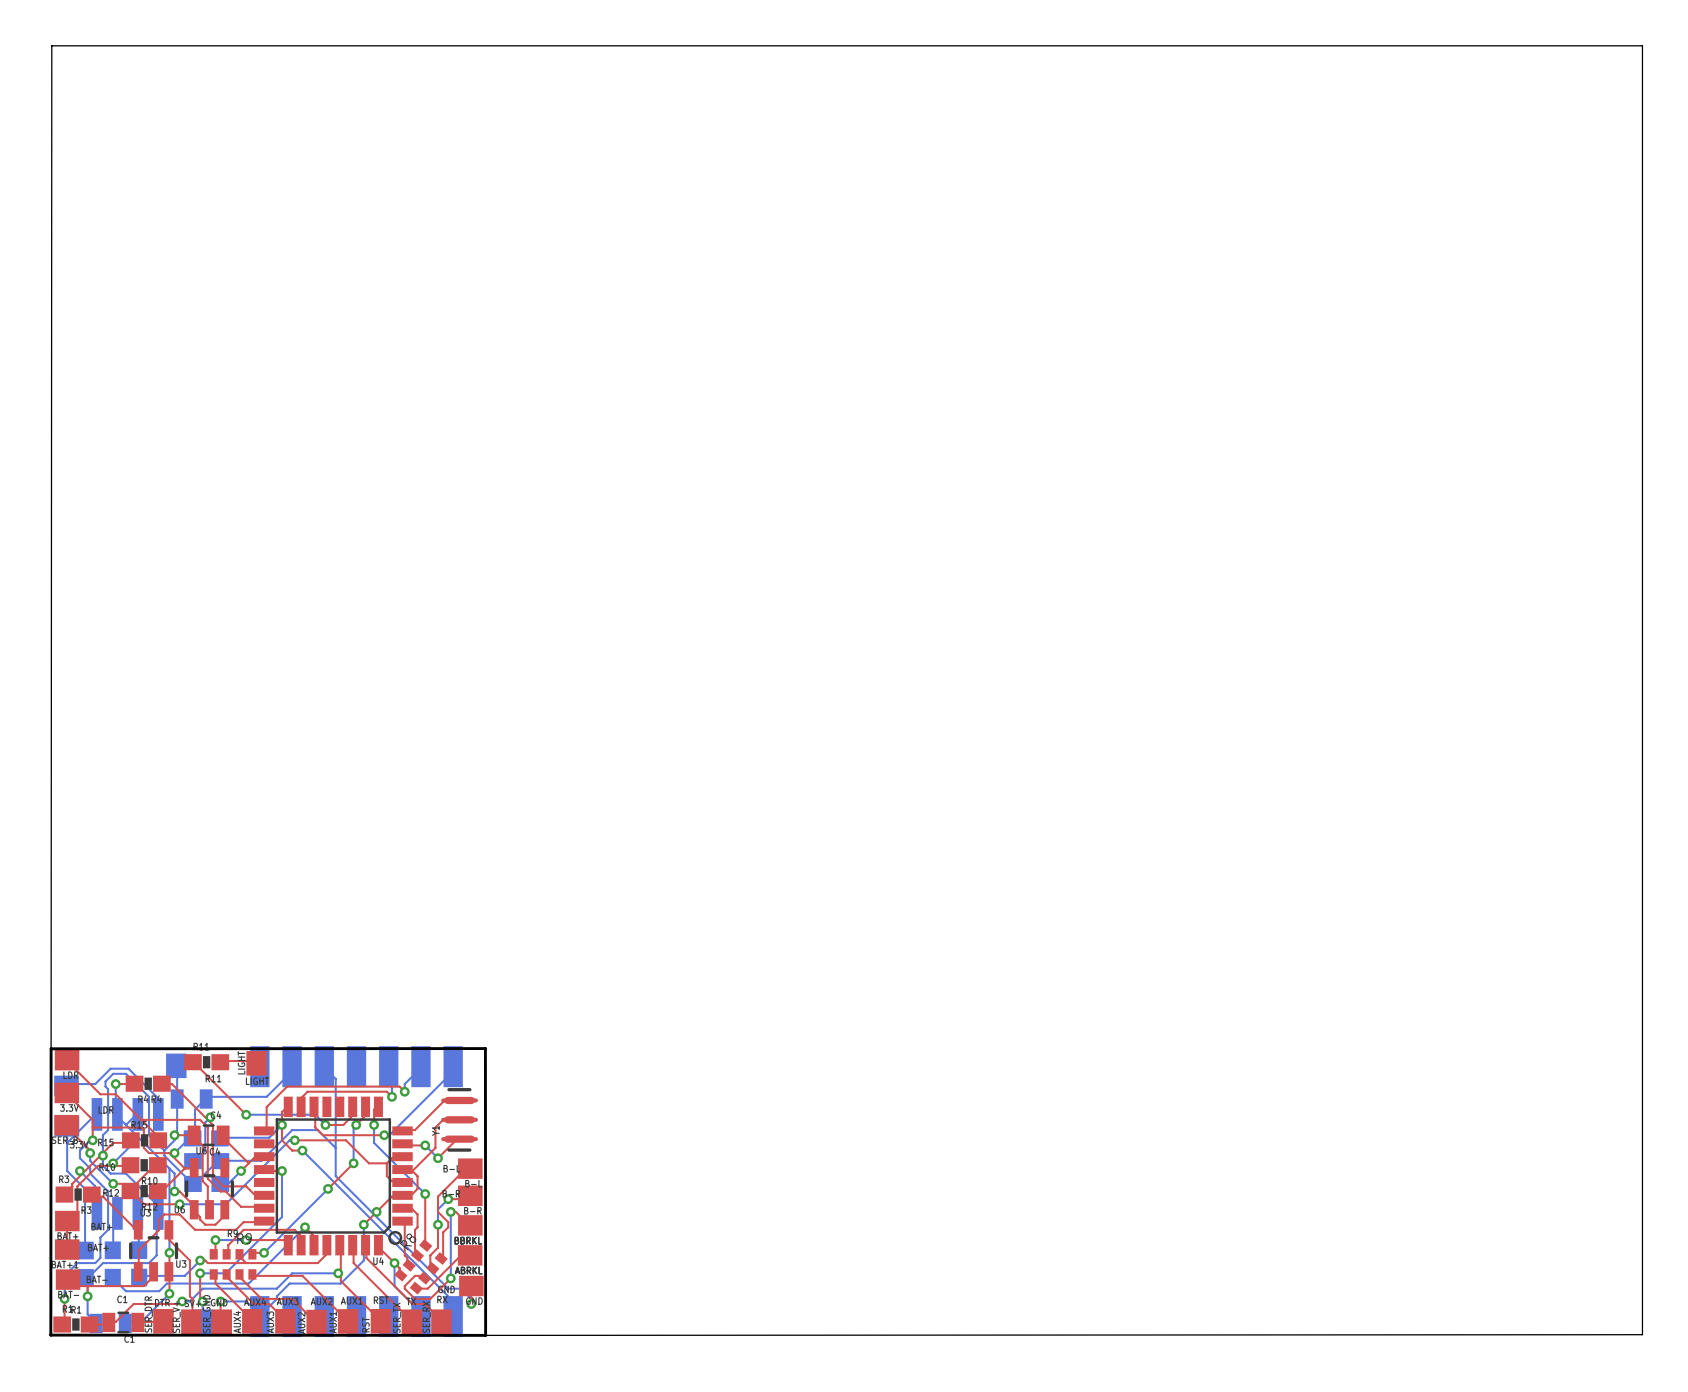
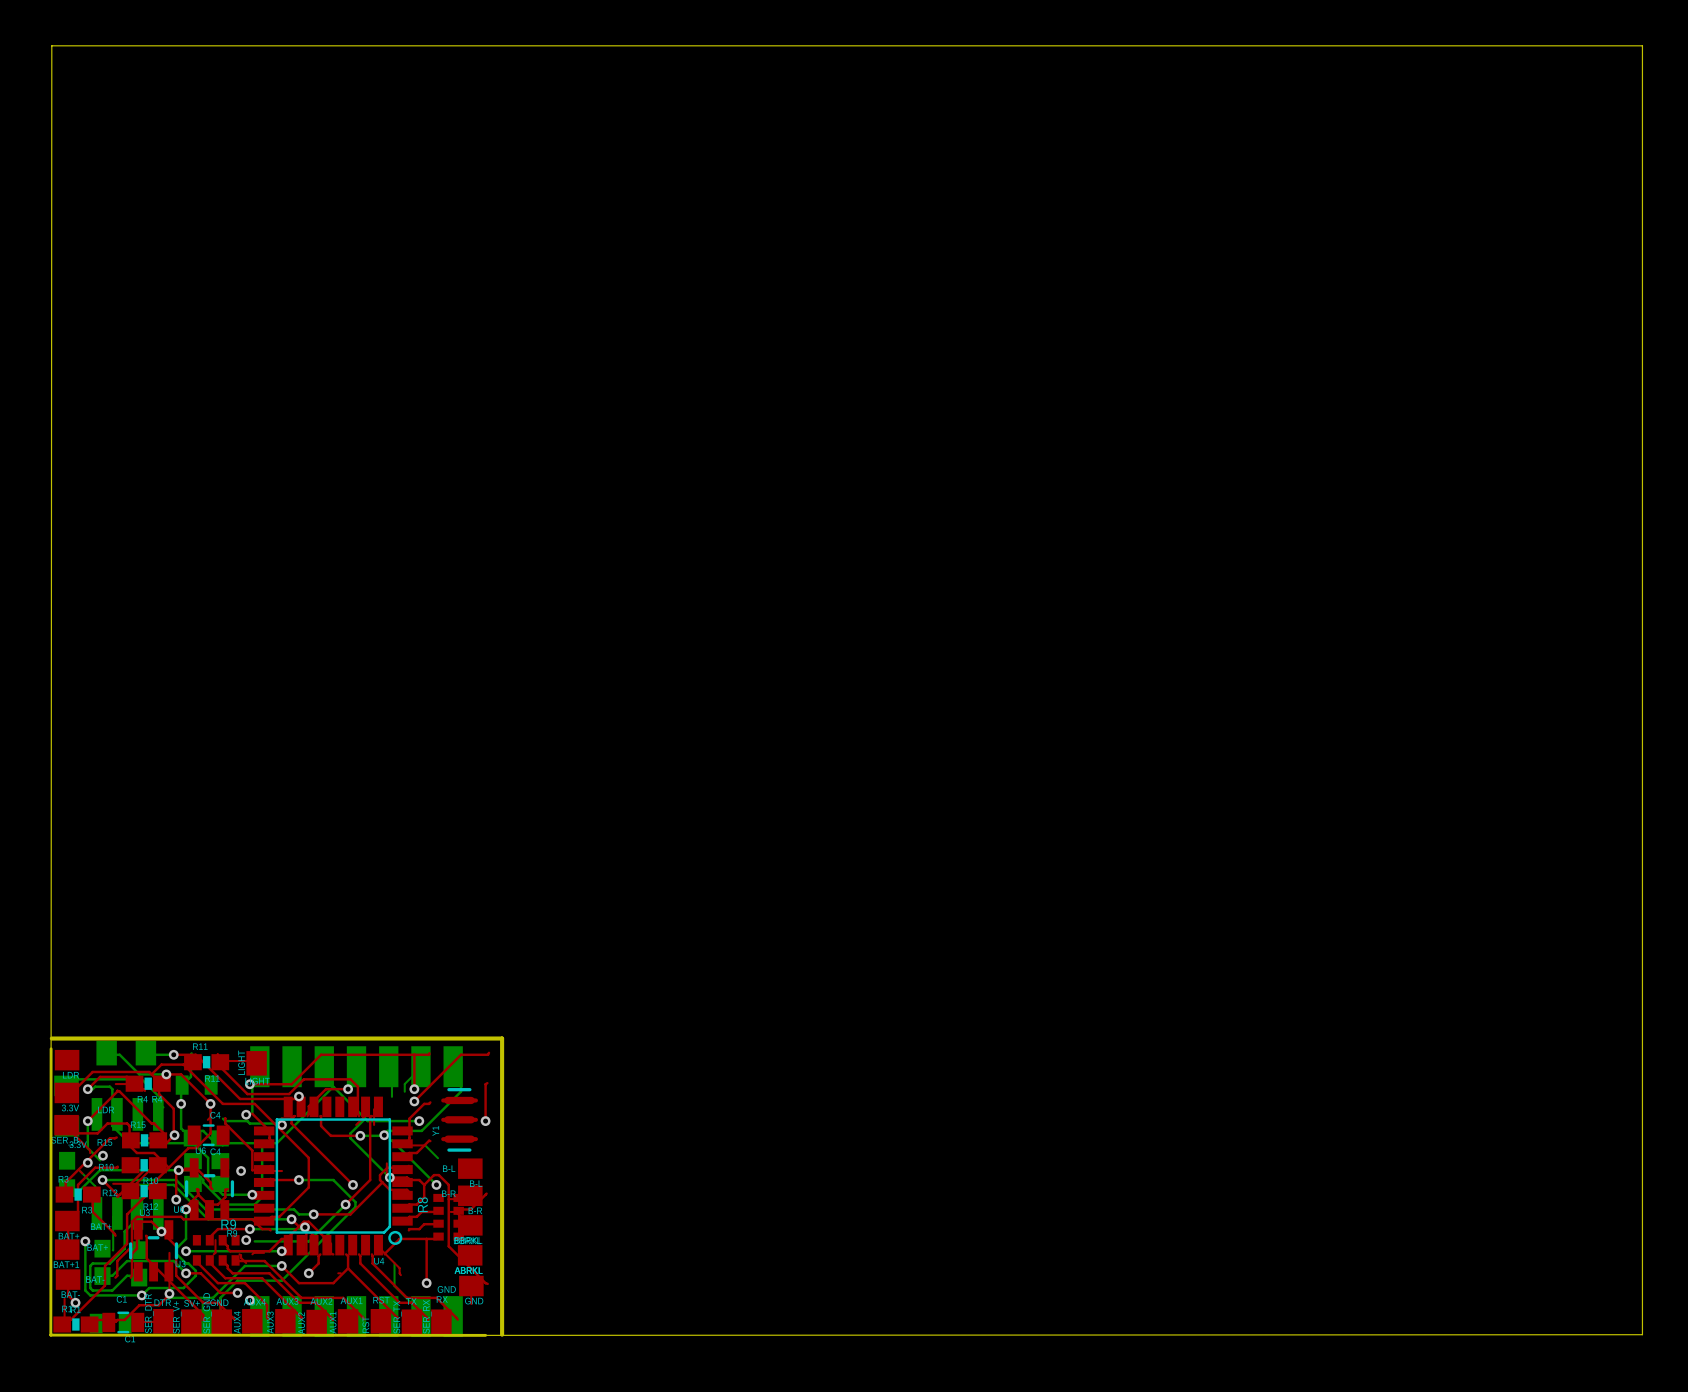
board edge: none -> (51, 1038) (502, 1038) (502, 1334)
board edge: (51, 1048) (485, 1048) (485, 1335) -> none
top track: none -> (488, 1052) (488, 1054) (461, 1054) (414, 1101)
bottom track: none -> (106, 1053) (107, 1054) (119, 1054) (139, 1074) (166, 1074)
part: none -> (106, 1053)
bottom track: none -> (145, 1053) (146, 1054) (173, 1054)
bottom track: none -> (191, 1053) (190, 1076) (181, 1086) (181, 1128) (183, 1130) (203, 1130) (215, 1143) (222, 1145) (222, 1143) (276, 1143) (333, 1086) (367, 1121) (419, 1121)
top track: none -> (429, 1053) (321, 1054) (291, 1084) (249, 1084)
top track: none -> (173, 1054) (195, 1054) (240, 1098) (296, 1098) (298, 1096)
via: none -> (173, 1054)
top track: none -> (217, 1054) (217, 1064) (247, 1094) (289, 1094) (303, 1079) (350, 1079) (357, 1086) (359, 1116)
top track: none -> (414, 1054) (414, 1089)
top track: (67, 1060) (100, 1094) (115, 1094) (156, 1135) (156, 1140) (158, 1140) -> none
bottom track: none -> (461, 1061) (461, 1091) (421, 1130) (387, 1130) (382, 1135) (360, 1135)
top track: (192, 1062) (246, 1114) -> none
bottom track: (176, 1065) (177, 1137) (164, 1150) -> none
part position: (176, 1065) -> (145, 1053)
bottom track: (292, 1066) (289, 1068) (289, 1073) (266, 1096) (207, 1096) (195, 1109) (195, 1137) (192, 1140) (187, 1140) (174, 1153) -> none
bottom track: (324, 1066) (335, 1078) (335, 1176) (448, 1288) (461, 1288) (471, 1298) (471, 1304) -> none
bottom track: (453, 1066) (450, 1068) (450, 1073) (389, 1135) (384, 1135) -> none
top track: none -> (151, 1074) (161, 1064) (183, 1064) (222, 1103) (254, 1103) (308, 1157) (308, 1187) (279, 1216) (270, 1217)
top track: none -> (166, 1074) (181, 1074) (210, 1103) (210, 1133) (195, 1148) (188, 1148) (146, 1189) (146, 1194) (127, 1214) (127, 1243) (105, 1265) (105, 1285) (68, 1321)
via: none -> (166, 1074)
bottom track: none -> (66, 1079) (141, 1079) (161, 1098) (161, 1106) (163, 1107)
top track: (161, 1083) (172, 1084) (212, 1124) (212, 1176) (223, 1186) (246, 1186) (253, 1194) (264, 1195) -> none
top track: none -> (487, 1083) (485, 1084) (485, 1121)
bottom track: (115, 1084) (115, 1112) (117, 1114) (115, 1114) (174, 1173) (174, 1191) -> none
via: (115, 1084) -> none
bottom track: none -> (249, 1084) (252, 1086) (252, 1113)
via: none -> (249, 1084)
bottom track: (66, 1085) (67, 1084) (95, 1084) (110, 1068) (128, 1068) (156, 1096) (158, 1114) -> none
bottom track: none -> (87, 1089) (92, 1089) (95, 1086) (109, 1086) (112, 1089) (112, 1126) (129, 1143) (193, 1143) (208, 1157) (208, 1180) (222, 1194) (252, 1194)
top track: none -> (87, 1089) (100, 1076) (127, 1076) (139, 1089) (144, 1090)
via: none -> (87, 1089)
top track: none -> (348, 1089) (325, 1089) (308, 1106) (307, 1116)
via: none -> (348, 1089)
via: none -> (414, 1089)
top track: (404, 1091) (399, 1086) (287, 1086) (266, 1107) (266, 1130) (264, 1130) -> none
via: (404, 1091) -> none
top track: (66, 1092) (92, 1119) (92, 1140) -> none
via: none -> (298, 1096)
top track: (391, 1096) (386, 1091) (307, 1091) (302, 1096) (301, 1106) -> none
via: (391, 1096) -> none
top track: none -> (68, 1099) (68, 1096) (92, 1071) (149, 1071) (159, 1081) (159, 1094) (173, 1108) (173, 1135) (166, 1143) (161, 1143) (156, 1138) (144, 1137)
part position: (191, 1099) -> (196, 1085)
top track: (443, 1100) (414, 1130) (402, 1130) -> none
via: none -> (414, 1101)
top track: none -> (430, 1102) (424, 1103) (409, 1118) (408, 1140)
via: none -> (181, 1103)
top track: (288, 1106) (281, 1112) (281, 1140) (292, 1150) (302, 1150) -> none
top track: (314, 1106) (315, 1127) (322, 1135) (384, 1135) -> none
top track: (352, 1106) (351, 1107) (351, 1117) (343, 1124) (325, 1124) -> none
top track: none -> (252, 1113) (269, 1130) (270, 1140)
bottom track: (96, 1114) (67, 1142) -> none
bottom track: (137, 1114) (125, 1124) -> none
bottom track: (246, 1114) (315, 1114) (325, 1124) -> none
top track: none -> (320, 1116) (321, 1126) (330, 1135) (360, 1135)
top track: none -> (371, 1116) (370, 1116) (370, 1180) (345, 1204)
bottom track: (210, 1117) (205, 1122) (205, 1150) (192, 1161) -> none
via position: (210, 1117) -> (210, 1103)
top track: none -> (225, 1118) (225, 1123) (252, 1150) (252, 1170) (267, 1170) (270, 1165)
bottom track: none -> (281, 1118) (276, 1123) (249, 1123) (247, 1121) (225, 1121) (223, 1118)
top track: none -> (281, 1118) (291, 1118)
top track: none -> (291, 1118) (294, 1116) (294, 1116) (291, 1118)
top track: none -> (291, 1118) (291, 1123) (352, 1184)
bottom track: none -> (365, 1118) (350, 1133) (350, 1138) (389, 1177)
top track: (141, 1119) (200, 1119) (207, 1127) (207, 1178) (220, 1191) (225, 1191) (241, 1206) (264, 1208) -> none
top track: (443, 1119) (435, 1127) (435, 1147) (412, 1171) -> none
bottom track: none -> (87, 1121) (87, 1148) (100, 1160)
top track: none -> (87, 1121) (117, 1090) (163, 1133)
via: none -> (87, 1121)
via: none -> (419, 1121)
via: none -> (485, 1121)
bottom track: (281, 1124) (269, 1137) (219, 1138) -> none
via: (325, 1124) -> none
bottom track: (356, 1124) (353, 1127) (353, 1163) -> none
via: (356, 1124) -> none
bottom track: (374, 1124) (374, 1142) (425, 1194) -> none
via: (374, 1124) -> none
bottom track: (67, 1126) (67, 1171) (85, 1188) (85, 1250) -> none
top track: (92, 1127) (141, 1127) (143, 1130) (143, 1147) (149, 1153) (169, 1153) (184, 1168) (164, 1188) (159, 1188) (157, 1191) -> none
top track: none -> (68, 1133) (97, 1133) (107, 1123) (127, 1123) (129, 1126) (129, 1145) (136, 1153) (154, 1153) (168, 1167)
top track: (174, 1135) (194, 1135) (202, 1145) (202, 1181) (207, 1186) (207, 1209) (209, 1209) -> none
top track: (223, 1135) (223, 1137) (248, 1163) -> none
via: none -> (360, 1135)
top track: none -> (116, 1137) (109, 1138) (65, 1182) (65, 1194) (63, 1195)
bottom track: (138, 1137) (113, 1163) -> none
top track: (459, 1139) (455, 1140) (438, 1158) -> none
bottom track: (92, 1140) (90, 1140) (79, 1150) (79, 1158) (90, 1168) (90, 1173) (108, 1191) (108, 1229) (100, 1237) (100, 1257) (95, 1263) (77, 1263) (64, 1275) (64, 1298) -> none
via: (92, 1140) -> none
top track: (130, 1140) (128, 1142) (113, 1142) (72, 1183) (72, 1186) (64, 1194) -> none
bottom track: (294, 1140) (289, 1140) (225, 1204) (179, 1204) -> none
top track: (294, 1140) (345, 1140) (368, 1163) (386, 1163) (391, 1158) (402, 1156) -> none
via: (294, 1140) -> none
bottom track: none -> (389, 1140) (392, 1140) (436, 1184)
top track: none -> (430, 1141) (416, 1153) (408, 1153)
bottom track: none -> (262, 1143) (262, 1197) (254, 1204) (225, 1204) (193, 1170) (100, 1170) (80, 1189)
via: (425, 1145) -> none
bottom track: (335, 1147) (317, 1130) (292, 1130) (261, 1160) (218, 1160) (192, 1183) (164, 1155) (164, 1150) -> none
bottom track: (164, 1150) (149, 1135) (149, 1096) (125, 1073) (113, 1073) (105, 1081) (105, 1086) (108, 1089) (108, 1130) (102, 1135) (102, 1165) (110, 1173) (125, 1173) (156, 1204) (158, 1213) (156, 1214) (156, 1255) (149, 1263) (102, 1263) (87, 1278) (87, 1314) (96, 1323) -> none
bottom track: (302, 1150) (450, 1298) (450, 1314) (453, 1316) -> none
via: (302, 1150) -> none
bottom track: (90, 1153) (90, 1160) (113, 1183) -> none
via: (90, 1153) -> none
via: (174, 1153) -> none
top track: (264, 1156) (264, 1158) (253, 1158) (241, 1171) -> none
via: (438, 1158) -> none
via: none -> (87, 1162)
via: (113, 1163) -> none
top track: (353, 1163) (328, 1188) -> none
via: (353, 1163) -> none
top track: (130, 1165) (97, 1165) (77, 1186) (77, 1211) (67, 1222) (67, 1249) -> none
top track: none -> (408, 1165) (407, 1167) (387, 1167) (380, 1175) (380, 1180) (389, 1189) (407, 1189) (408, 1191)
top track: none -> (117, 1166) (95, 1167) (78, 1184) (78, 1211) (67, 1223) (68, 1253) (66, 1255)
top track: none -> (145, 1166) (146, 1167) (117, 1196) (102, 1180)
bottom track: (169, 1168) (169, 1252) -> none
top track: (470, 1168) (468, 1171) (463, 1171) (438, 1196) (438, 1211) (448, 1222) (448, 1227) (443, 1232) (443, 1257) (441, 1258) -> none
via: none -> (178, 1170)
via: (79, 1171) -> none
bottom track: (241, 1171) (228, 1183) (220, 1183) -> none
bottom track: (281, 1171) (281, 1217) (225, 1273) (200, 1273) -> none
via: (281, 1171) -> none
top track: (412, 1171) (417, 1176) (417, 1188) (412, 1194) (391, 1196) (363, 1224) -> none
part: none -> (67, 1174)
top track: none -> (389, 1177) (419, 1180) (424, 1184)
via: none -> (389, 1177)
top track: none -> (270, 1178) (298, 1180)
bottom track: none -> (102, 1180) (176, 1180) (205, 1209) (294, 1209) (298, 1214) (313, 1214)
via: none -> (102, 1180)
bottom track: none -> (298, 1180) (333, 1180) (355, 1202) (355, 1207) (281, 1280) (237, 1280) (220, 1297) (219, 1319)
via: none -> (298, 1180)
top track: none -> (382, 1182) (350, 1214) (313, 1214)
via: (113, 1183) -> none
via: none -> (352, 1184)
top track: none -> (424, 1184) (424, 1197) (416, 1204) (408, 1204)
top track: none -> (424, 1184) (434, 1175) (438, 1175) (448, 1184) (448, 1246) (487, 1283)
via: none -> (436, 1184)
bottom track: (328, 1188) (264, 1252) -> none
via: (328, 1188) -> none
top track: none -> (212, 1189) (210, 1182) (198, 1170) (178, 1170) (176, 1172) (176, 1199)
top track: none -> (227, 1189) (225, 1189) (225, 1197) (217, 1204) (208, 1204) (198, 1194)
top track: (130, 1191) (143, 1204) (179, 1204) -> none
top track: (174, 1191) (179, 1191) (192, 1204) (192, 1209) (205, 1224) (215, 1224) (223, 1217) (224, 1209) -> none
via: (174, 1191) -> none
top track: none -> (486, 1193) (470, 1209) (458, 1210)
top track: (91, 1194) (92, 1196) (102, 1196) (138, 1229) -> none
top track: none -> (198, 1194) (198, 1189) (197, 1189) (198, 1194)
top track: none -> (198, 1194) (186, 1207) (186, 1209)
via: none -> (252, 1194)
top track: (425, 1194) (425, 1245) -> none
via: (425, 1194) -> none
top track: none -> (91, 1195) (92, 1211) (115, 1235)
via: none -> (176, 1199)
bottom track: (448, 1199) (438, 1209) (438, 1224) -> none
via: (448, 1199) -> none
via: (179, 1204) -> none
bottom track: none -> (345, 1204) (308, 1241) (254, 1241)
via: none -> (345, 1204)
top track: (402, 1208) (412, 1209) (417, 1214) (417, 1227) (414, 1229) (414, 1255) (417, 1255) -> none
bottom track: none -> (186, 1209) (186, 1238) (176, 1248) (176, 1253) (195, 1270) (195, 1275) (183, 1288) (149, 1288) (141, 1295) (90, 1295) (85, 1290) (85, 1241)
via: none -> (186, 1209)
top track: none -> (438, 1210) (421, 1211) (416, 1216) (408, 1217)
via: (376, 1211) -> none
bottom track: (450, 1211) (450, 1278) -> none
via: (450, 1211) -> none
via: none -> (313, 1214)
bottom track: none -> (291, 1219) (208, 1219) (173, 1184) (136, 1184) (132, 1189) (132, 1224) (124, 1231) (124, 1248) (109, 1263) (92, 1263) (90, 1265) (90, 1288) (92, 1290) (112, 1290) (127, 1275) (137, 1274)
top track: none -> (291, 1219) (298, 1226)
via: none -> (291, 1219)
top track: (264, 1221) (243, 1222) (235, 1229) (195, 1229) (179, 1214) (164, 1214) (159, 1219) (159, 1229) (138, 1250) (138, 1271) -> none
top track: (402, 1221) (404, 1222) (404, 1255) (409, 1265) -> none
top track: none -> (438, 1223) (424, 1224) (419, 1229) (408, 1230)
bottom track: (363, 1224) (363, 1260) (340, 1283) (289, 1283) (259, 1316) (246, 1301) (220, 1301) -> none
via: (363, 1224) -> none
top track: (438, 1224) (438, 1247) (430, 1255) (430, 1268) (432, 1268) -> none
via: (438, 1224) -> none
bottom track: (305, 1227) (248, 1283) (166, 1283) (159, 1291) (125, 1291) (112, 1277) -> none
top track: (168, 1229) (169, 1240) (189, 1260) (189, 1296) (192, 1298) (191, 1321) -> none
bottom track: none -> (249, 1229) (303, 1229) (306, 1231)
top track: none -> (249, 1229) (217, 1229) (210, 1236) (209, 1240)
via: none -> (249, 1229)
top track: none -> (270, 1230) (262, 1229) (252, 1219) (136, 1216) (132, 1221) (132, 1246) (117, 1261) (117, 1275) (115, 1277)
via: none -> (161, 1231)
top track: none -> (306, 1231) (307, 1254)
top track: none -> (146, 1235) (146, 1258) (203, 1315) (204, 1320)
top track: none -> (438, 1236) (436, 1238) (399, 1238) (384, 1254)
top track: none -> (426, 1238) (426, 1283)
bottom track: (215, 1240) (246, 1240) -> none
via: (215, 1240) -> none
top track: none -> (222, 1240) (230, 1251) (269, 1251) (281, 1238) (286, 1238) (303, 1221) (308, 1221) (330, 1243) (330, 1253) (333, 1254)
top track: (246, 1240) (284, 1240) (288, 1245) -> none
via: none -> (85, 1241)
top track: (301, 1245) (299, 1234) (294, 1229) (243, 1229) (228, 1245) (226, 1254) -> none
top track: (326, 1245) (325, 1255) (317, 1263) (207, 1263) (205, 1260) (200, 1260) -> none
top track: (339, 1245) (340, 1280) (380, 1321) -> none
top track: (352, 1245) (353, 1263) (411, 1321) -> none
top track: (365, 1245) (366, 1257) (412, 1304) (425, 1304) (441, 1321) -> none
bottom track: none -> (186, 1251) (281, 1251)
via: none -> (186, 1251)
via: none -> (281, 1251)
via: (169, 1252) -> none
via: (264, 1252) -> none
top track: none -> (320, 1254) (318, 1263) (308, 1273)
top track: none -> (346, 1254) (348, 1256) (348, 1268)
top track: none -> (359, 1254) (360, 1263) (399, 1302) (411, 1302) (428, 1319)
top track: none -> (371, 1254) (372, 1263) (407, 1297) (436, 1297) (457, 1319)
top track: (470, 1255) (461, 1255) (427, 1288) (416, 1288) -> none
top track: none -> (196, 1260) (217, 1283) (244, 1283) (267, 1305) (268, 1319)
bottom track: (200, 1260) (184, 1275) (141, 1275) (139, 1277) -> none
via: (200, 1260) -> none
top track: none -> (209, 1260) (225, 1278) (262, 1278) (301, 1319)
top track: none -> (222, 1260) (232, 1273) (269, 1273) (298, 1302) (316, 1302) (332, 1319)
top track: none -> (235, 1260) (264, 1261) (301, 1297) (343, 1297) (364, 1319)
part: none -> (102, 1262)
via: (394, 1263) -> none
part: (85, 1264) -> none
part: (112, 1264) -> none
R9 position: (233, 1264) -> (216, 1250)
bottom track: none -> (281, 1265) (244, 1265) (213, 1297) (166, 1297)
top track: none -> (281, 1265) (298, 1283) (333, 1283) (348, 1268)
via: none -> (281, 1265)
R8 rotation: 0° (421, 1266) -> 40° counterclockwise (448, 1217)
R8 position: (421, 1266) -> (448, 1217)
top track: none -> (348, 1268) (397, 1319)
top track: (153, 1271) (151, 1278) (143, 1286) (74, 1286) (68, 1279) -> none
bottom track: none -> (186, 1273) (173, 1261) (127, 1261) (112, 1275) (102, 1275)
top track: none -> (186, 1273) (200, 1273) (220, 1292) (237, 1292)
via: none -> (186, 1273)
top track: (200, 1273) (200, 1298) (202, 1301) -> none
via: (200, 1273) -> none
via: none -> (308, 1273)
bottom track: (338, 1273) (292, 1273) (276, 1288) (202, 1288) (189, 1301) (182, 1301) -> none
via: (338, 1273) -> none
top track: (213, 1274) (215, 1283) (252, 1321) -> none
top track: (226, 1274) (253, 1304) (269, 1304) (285, 1321) -> none
top track: (239, 1274) (241, 1278) (261, 1298) (292, 1298) (316, 1322) -> none
top track: (252, 1274) (302, 1275) (348, 1321) -> none
top track: none -> (130, 1277) (132, 1253) (136, 1248) (136, 1224) (139, 1221) (151, 1221) (176, 1246) (176, 1275) (203, 1302) (217, 1302) (234, 1319)
top track: (424, 1278) (422, 1275) (414, 1275) (404, 1286) (404, 1288) (414, 1298) (430, 1298) (450, 1278) -> none
via: (450, 1278) -> none
via: none -> (426, 1283)
top track: none -> (67, 1284) (68, 1295) (75, 1302)
top track: (87, 1286) (87, 1296) -> none
via: none -> (237, 1292)
bottom track: (169, 1293) (141, 1321) (125, 1323) -> none
via: none -> (141, 1295)
via: (87, 1296) -> none
top track: none -> (166, 1297) (159, 1305) (139, 1305) (124, 1319) (115, 1321) (114, 1319) (97, 1319) (95, 1321)
via: (64, 1298) -> none
via: none -> (249, 1300)
top track: (182, 1301) (179, 1304) (133, 1304) (115, 1321) (108, 1322) (108, 1324) (89, 1324) -> none
via: (182, 1301) -> none
via: (202, 1301) -> none
via: (220, 1301) -> none
via: none -> (75, 1302)
via: (471, 1304) -> none

